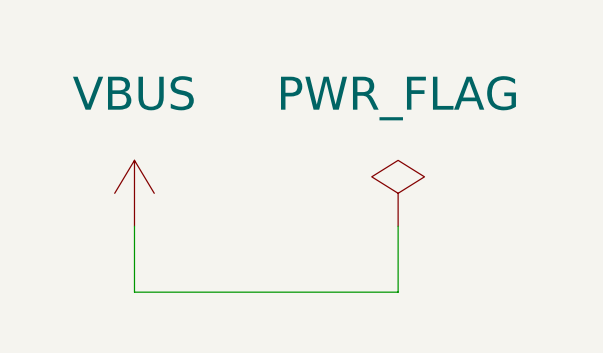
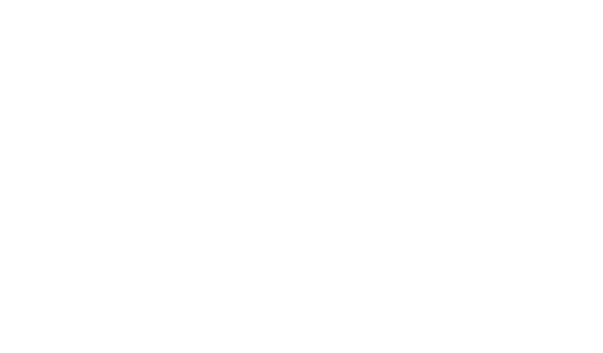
power symbol: VBUS (134, 193) -> none
power symbol: PWR_FLAG (398, 193) -> none
wire: (134, 226) (134, 292) (398, 292) (398, 226) -> none

